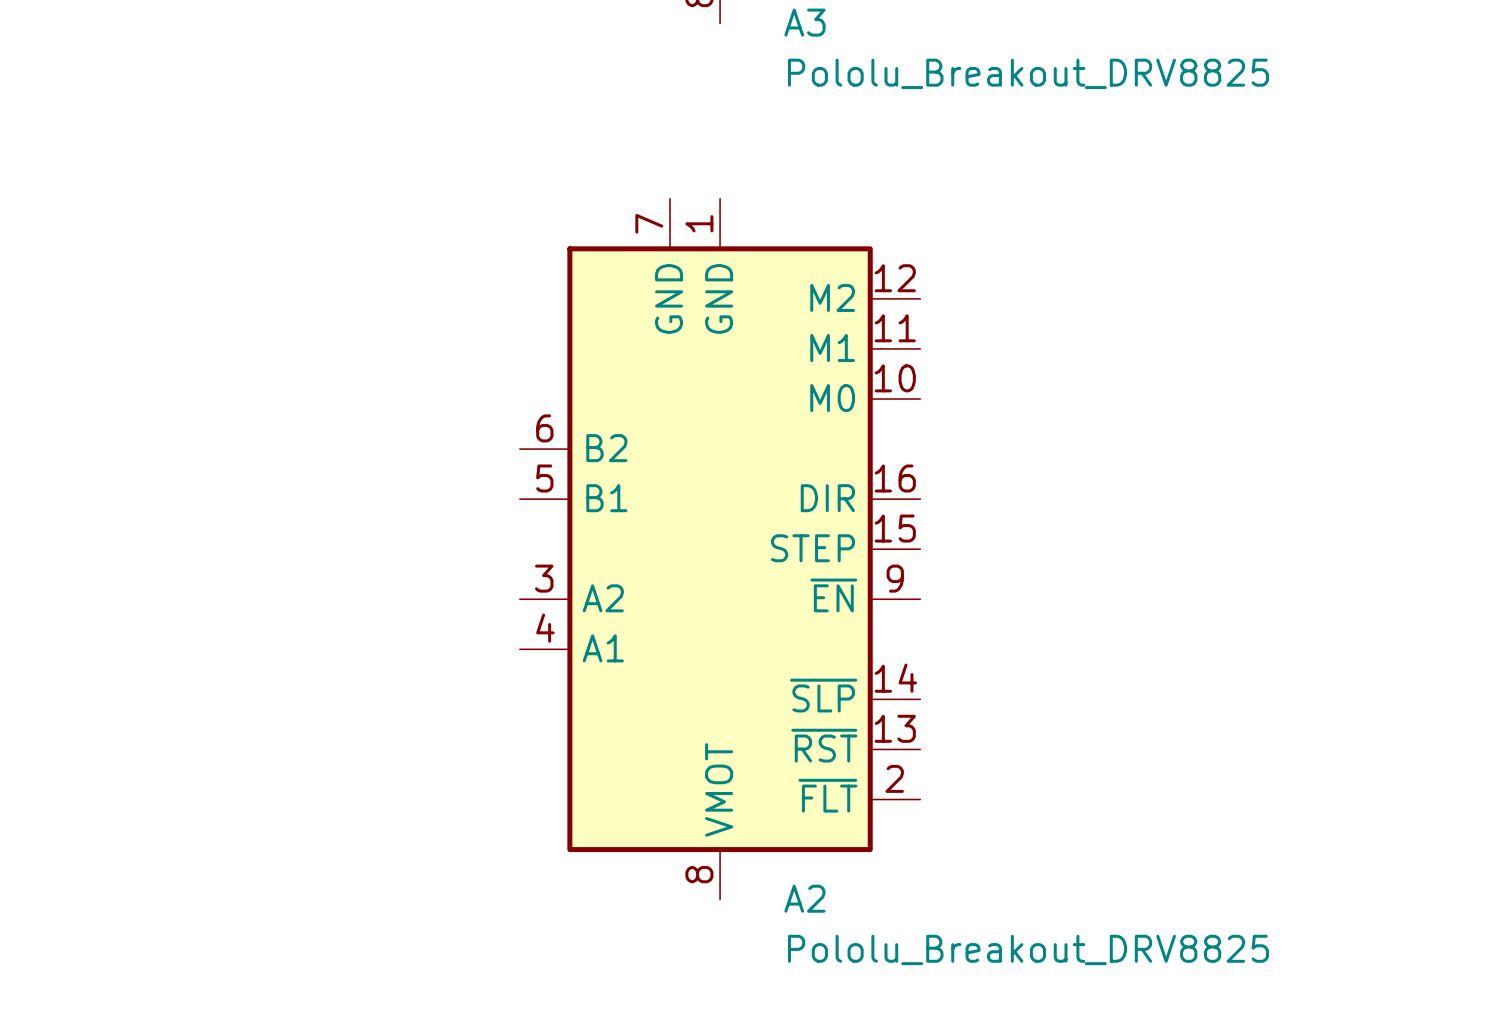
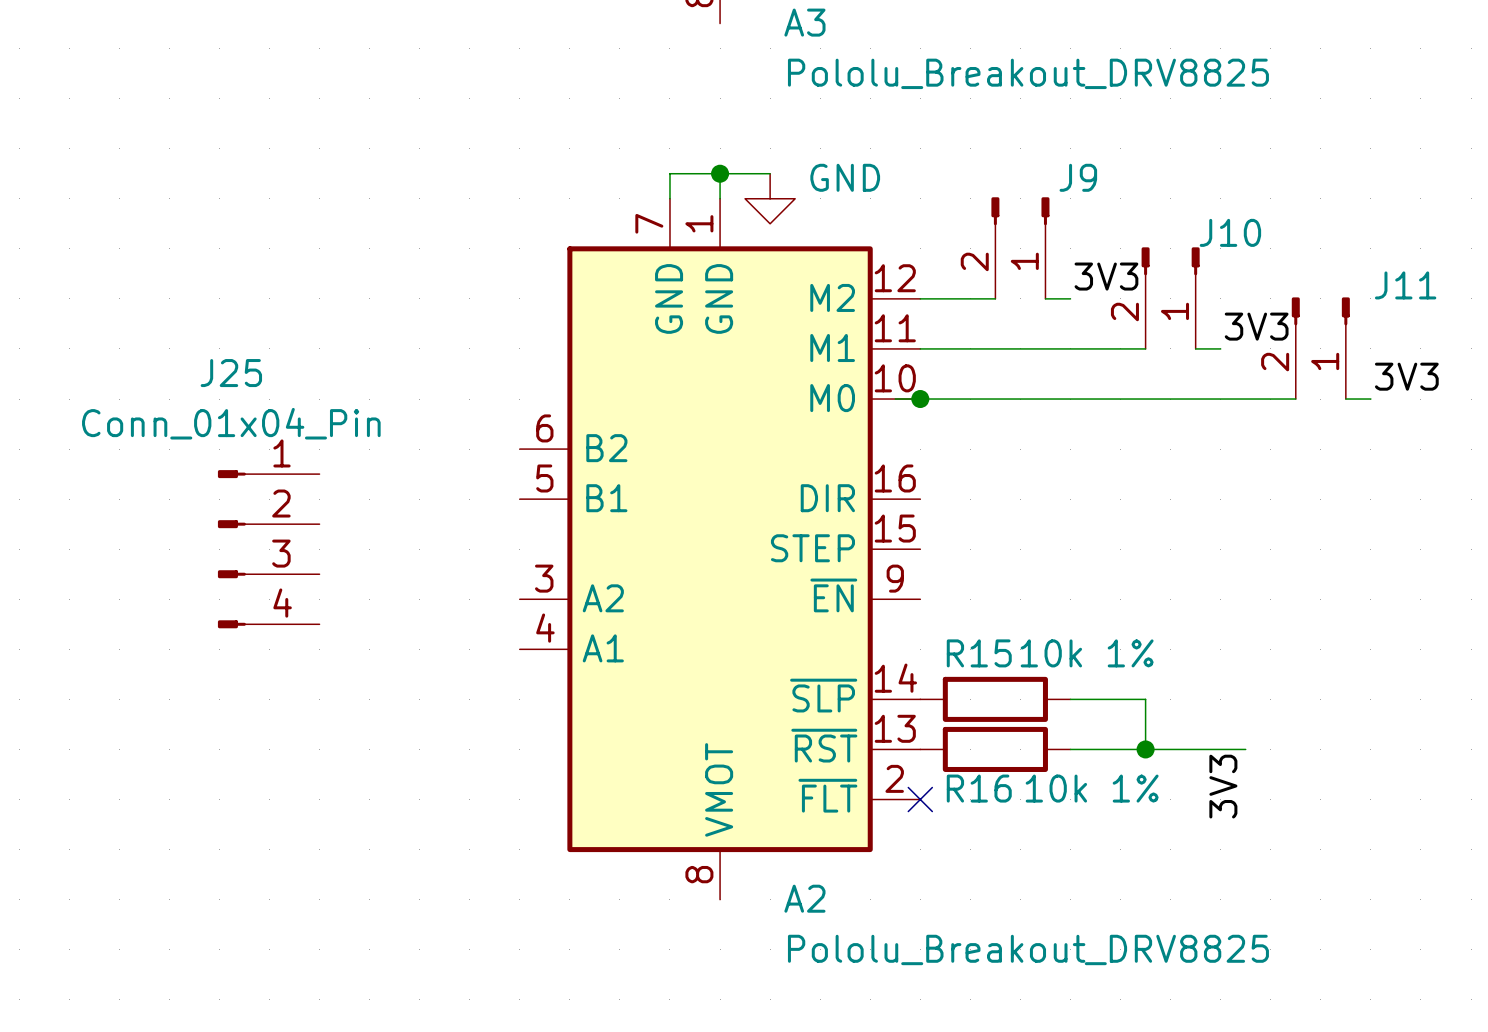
wire: none -> (720, 173) (720, 198)
junction: none -> (720, 173)
wire: none -> (770, 173) (669, 173) (669, 198)
power symbol: none -> GND (770, 198)
J9: none -> (1020, 248)
label: none -> 3V3 (1106, 276)
wire: none -> (920, 298) (995, 298)
wire: none -> (1045, 298) (1070, 298)
J10: none -> (1170, 298)
label: none -> 3V3 (1256, 326)
wire: none -> (920, 348) (1145, 348)
wire: none -> (1195, 348) (1220, 348)
J11: none -> (1320, 348)
label: none -> 3V3 (1406, 376)
wire: none -> (895, 399) (1295, 399)
junction: none -> (920, 399)
wire: none -> (1345, 399) (1370, 399)
J25: none -> Conn_01x04_Pin (268, 549)
R15: none -> 10k 1% (995, 699)
wire: none -> (1070, 699) (1145, 699) (1145, 749)
R16: none -> 10k 1% (995, 749)
wire: none -> (1070, 749) (1245, 749)
junction: none -> (1145, 749)
label: none -> 3V3 (1223, 786)
no-connect mark: none -> (920, 799)

